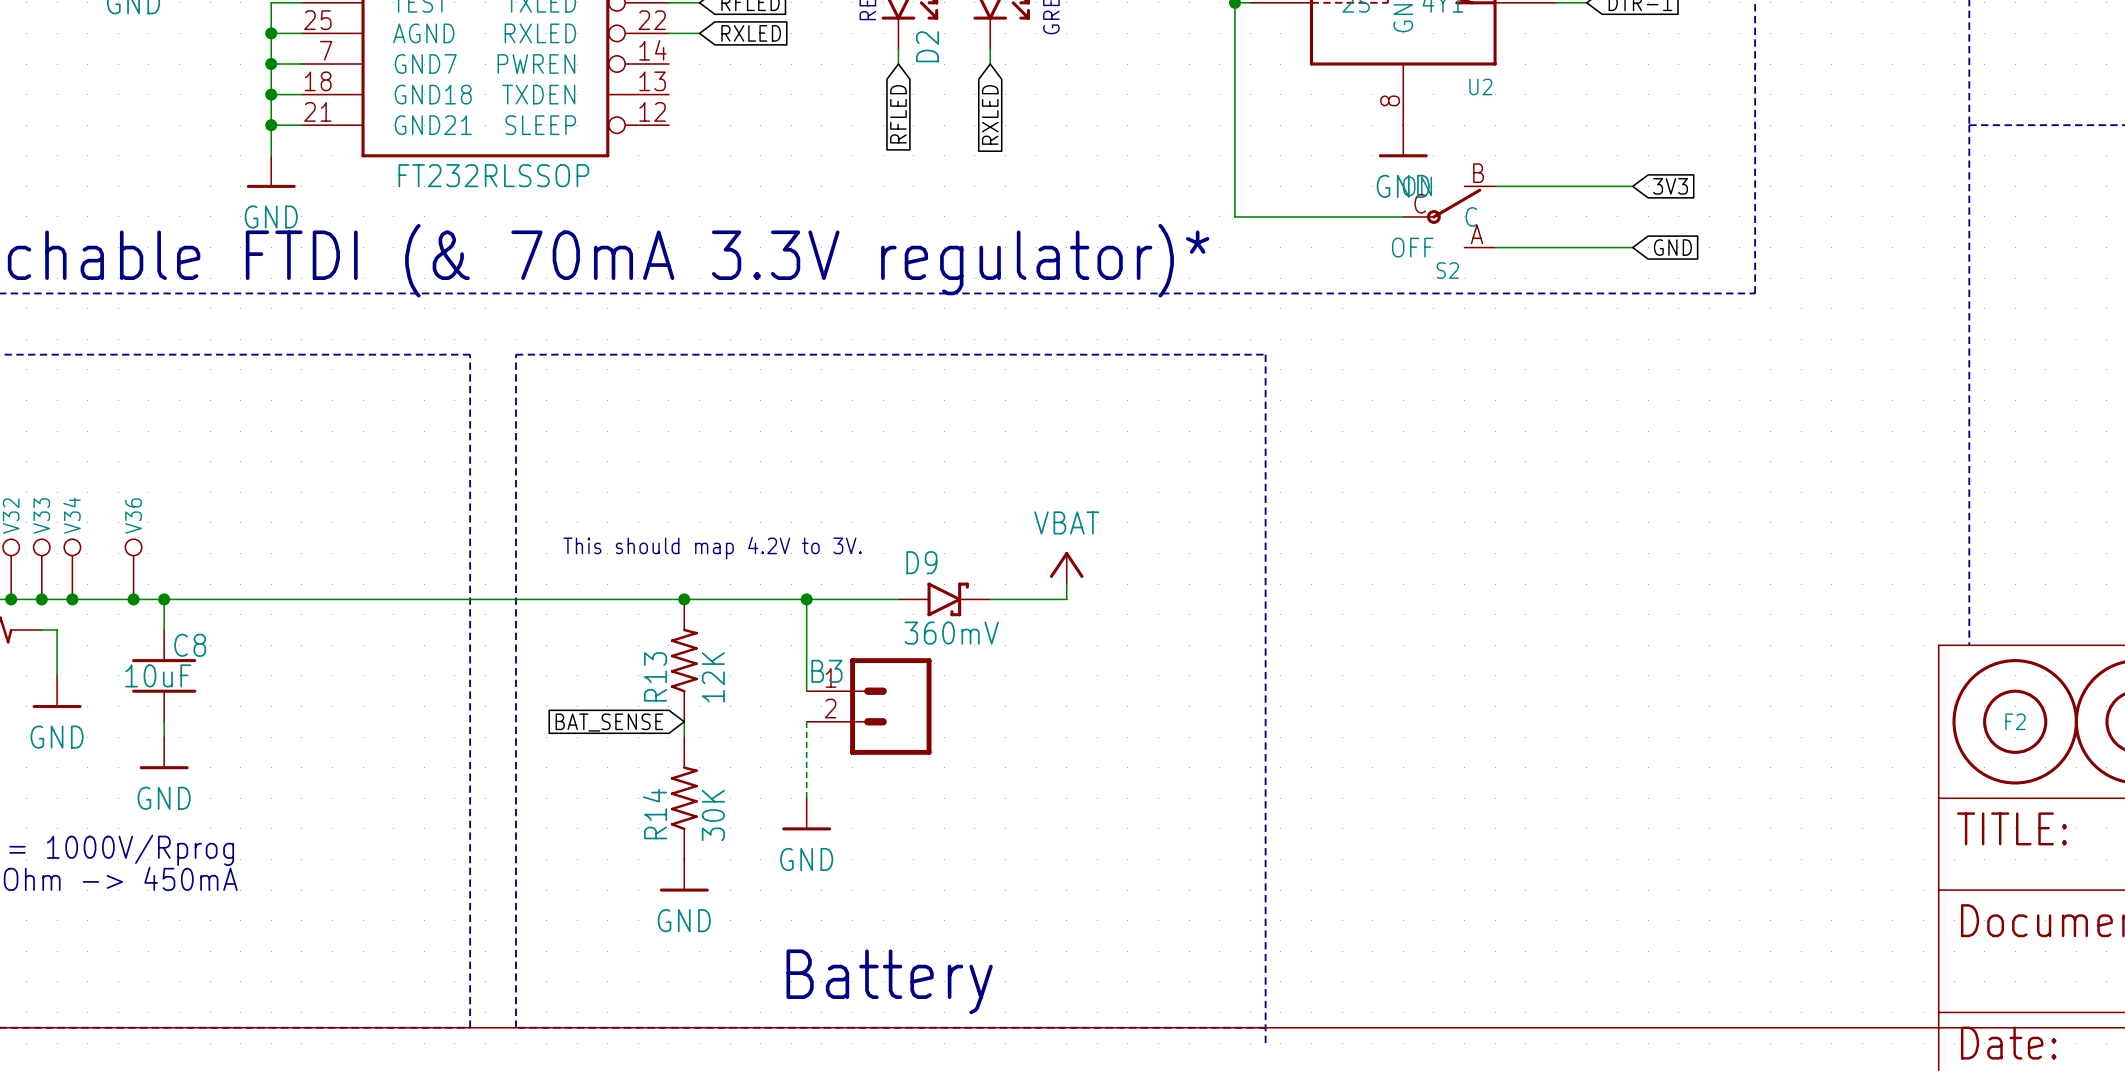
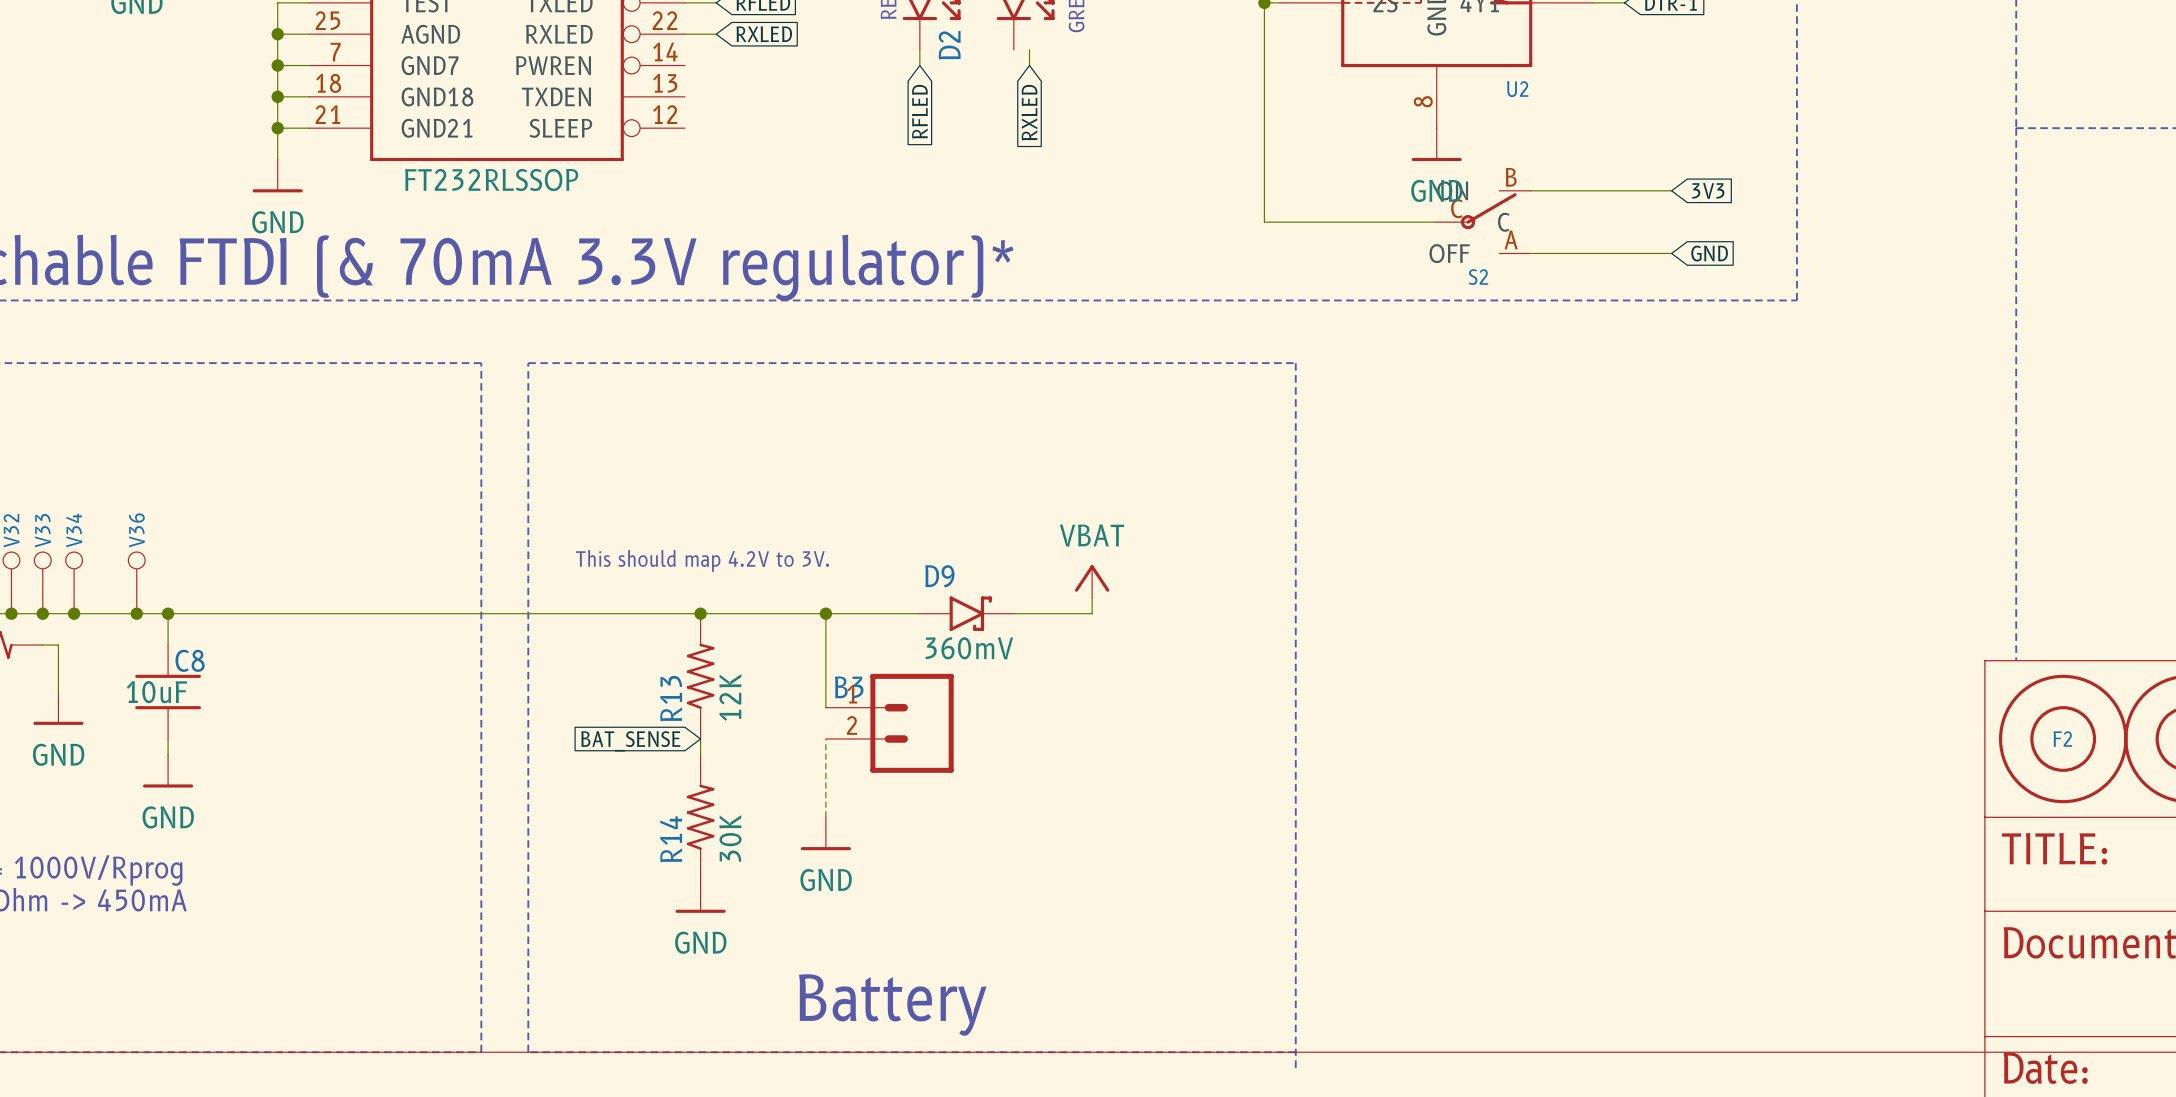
wire: (990, 48) (990, 64) -> (1029, 49) (1029, 65)
global label position: RXLED (990, 114) -> RXLED (1029, 112)

